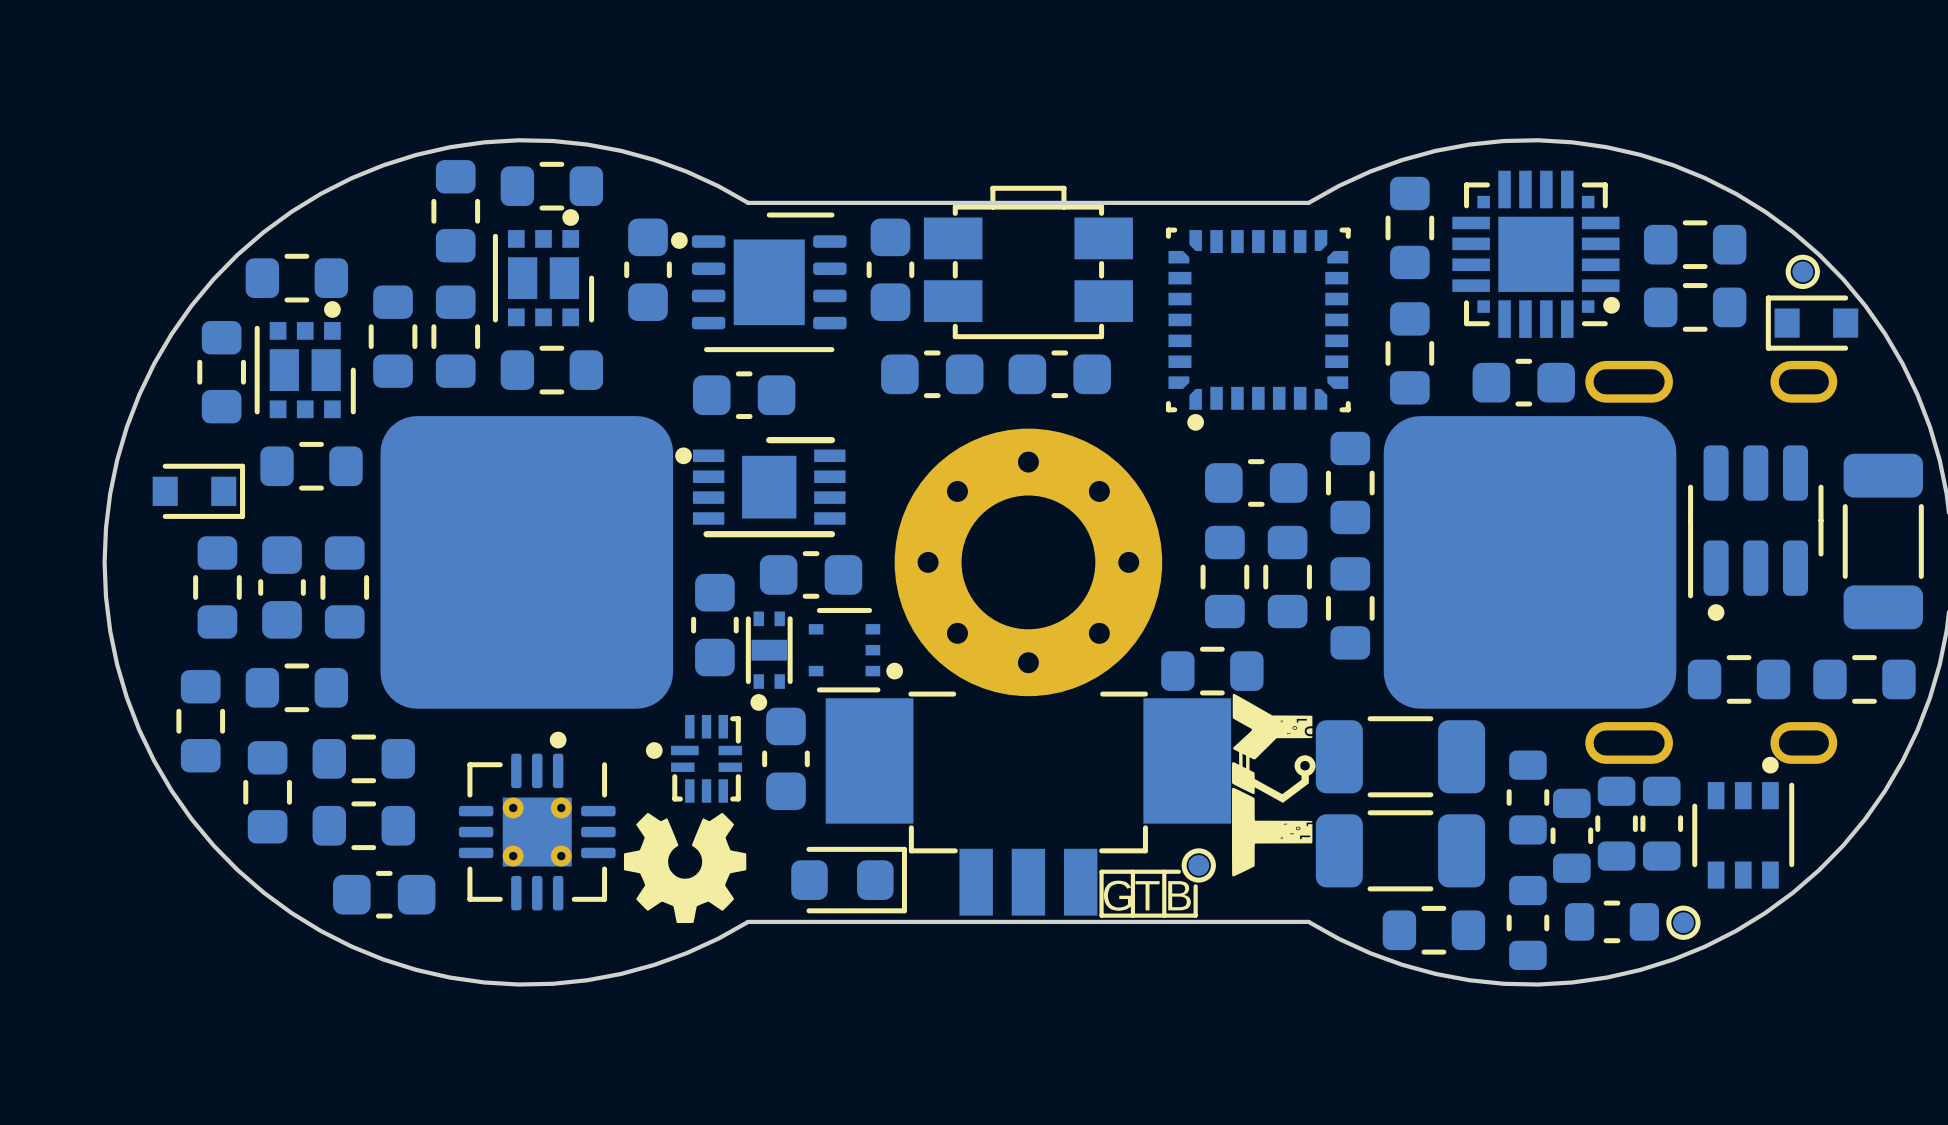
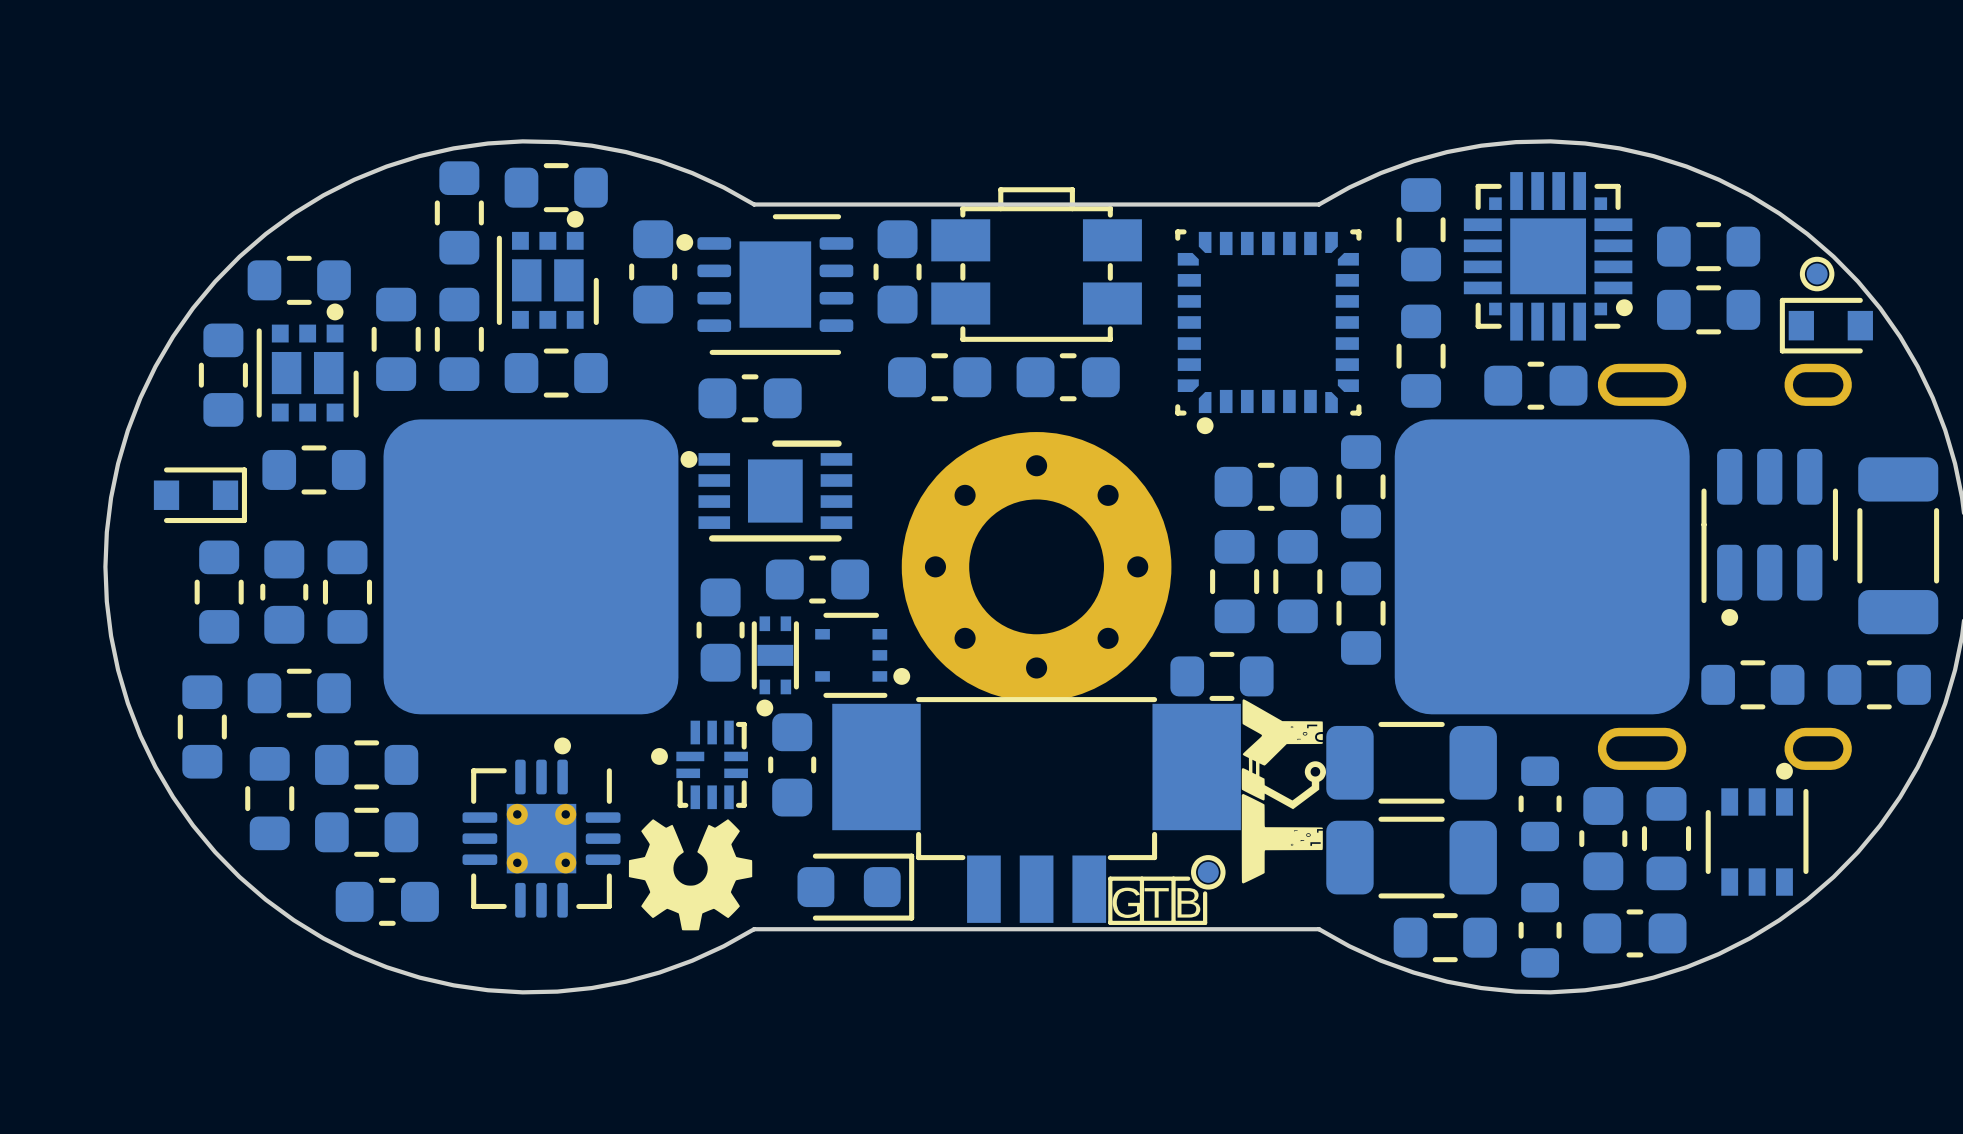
part footprint: [825, 691, 1232, 916] -> [832, 697, 1241, 923]
part footprint: [1640, 776, 1684, 871] -> [1641, 787, 1692, 891]
part: (1616, 823) -> none
part: none -> (1603, 838)
part: (1571, 835) -> none
part footprint: [1564, 900, 1660, 944] -> [1583, 909, 1687, 958]
part: (1683, 922) -> none

